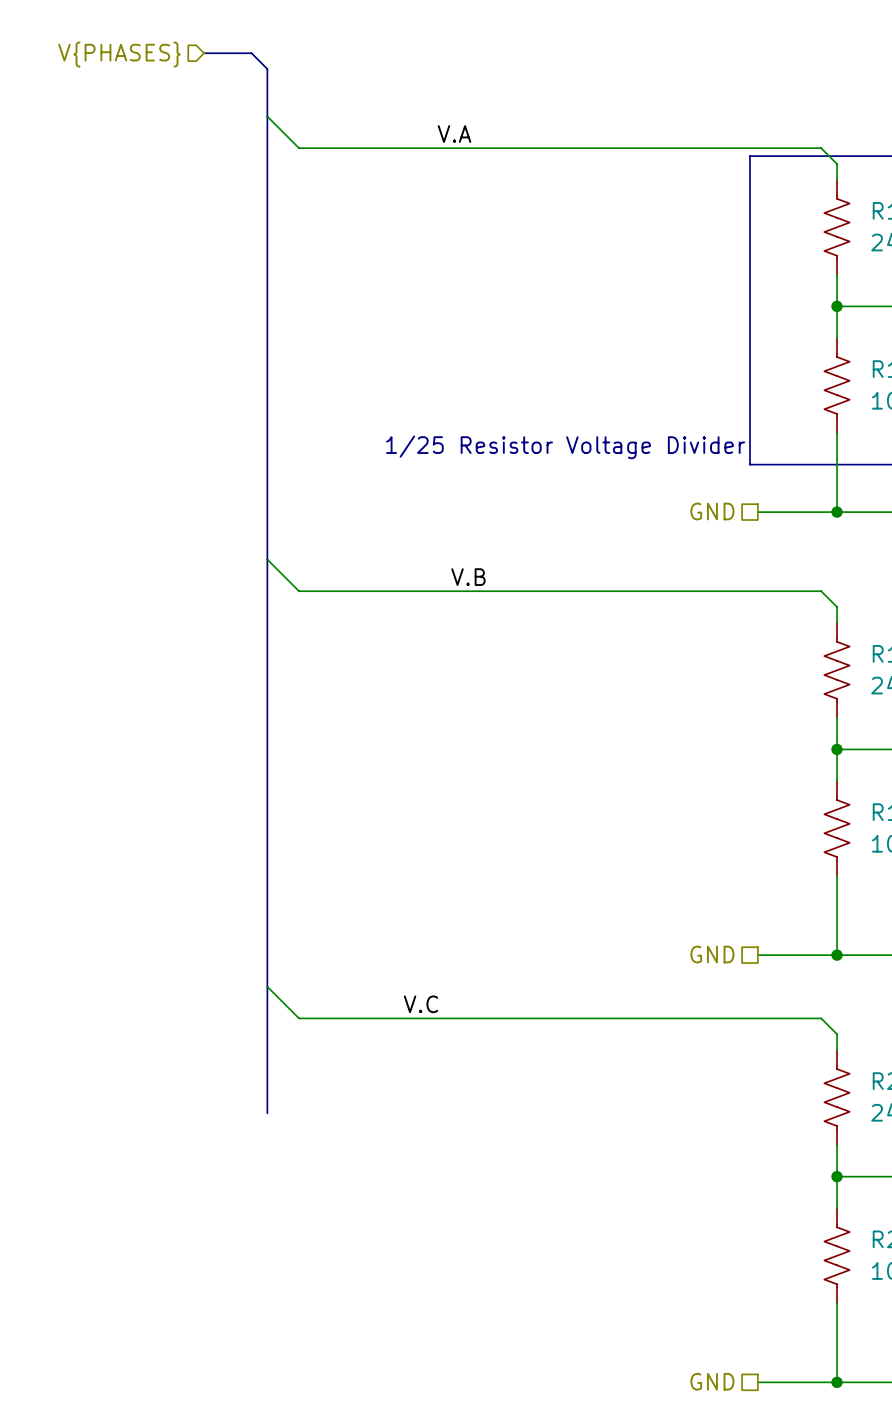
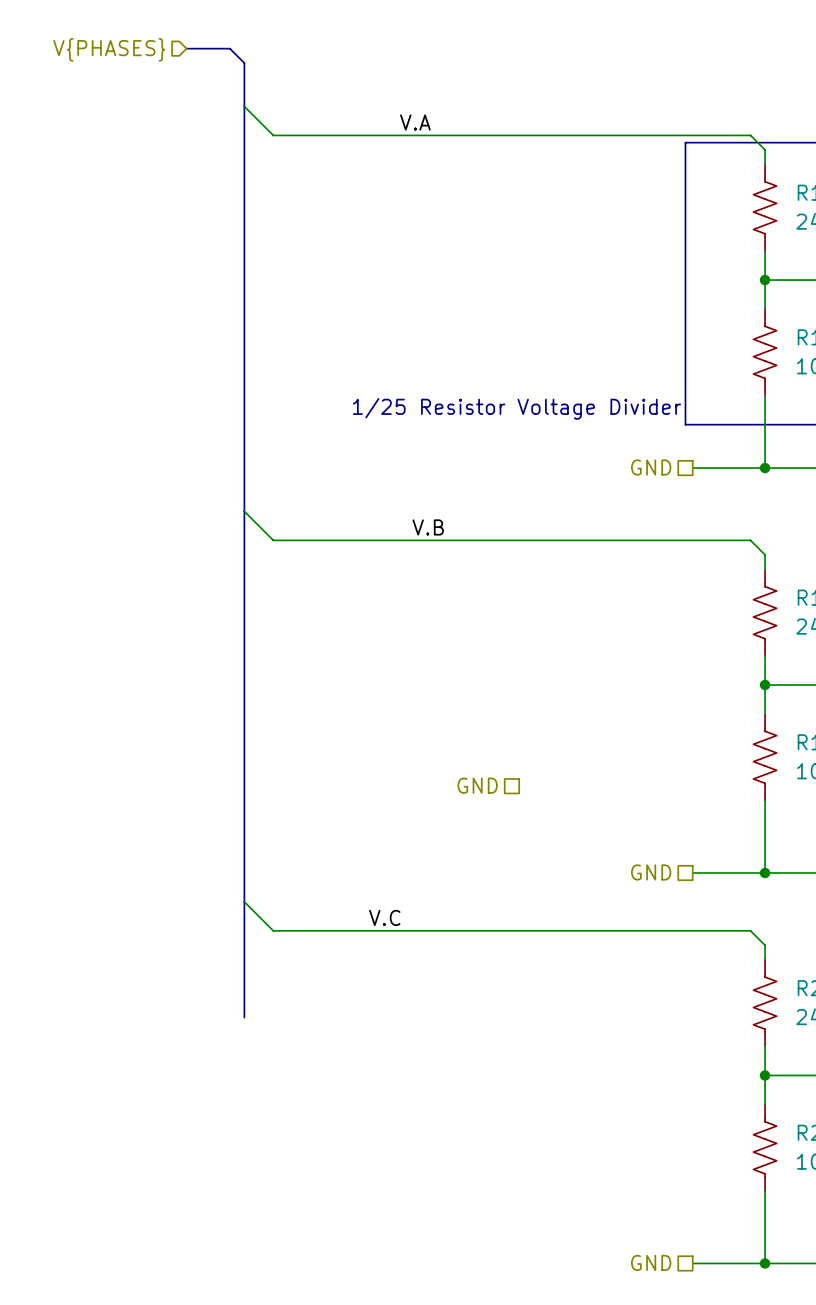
hierarchical label: none -> GND (477, 785)

